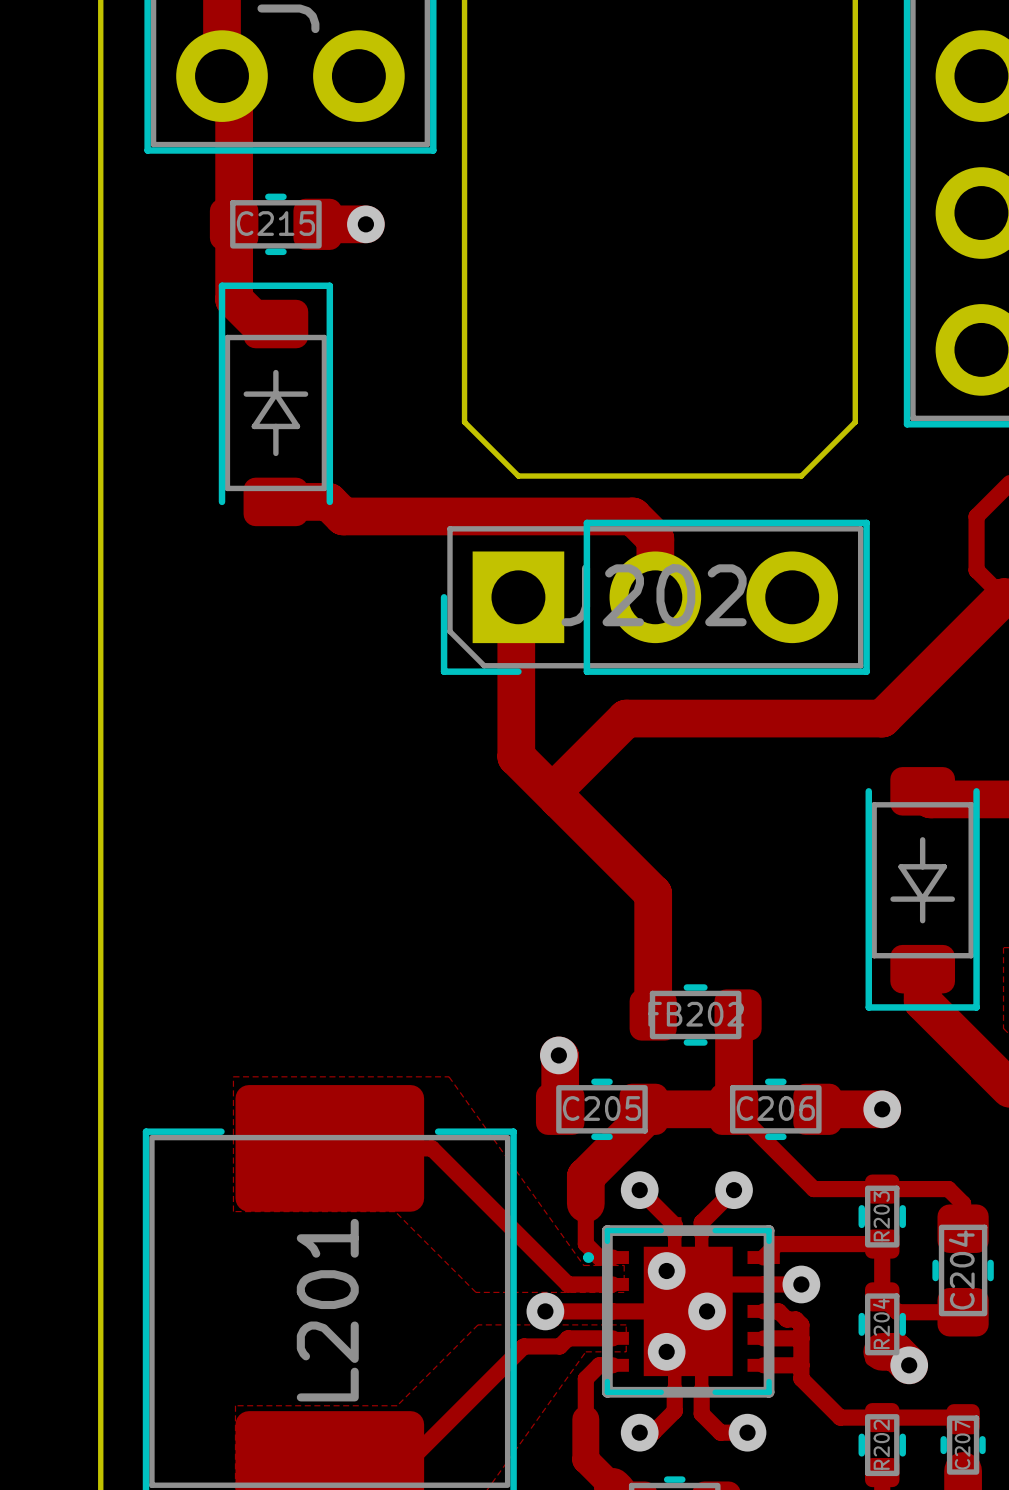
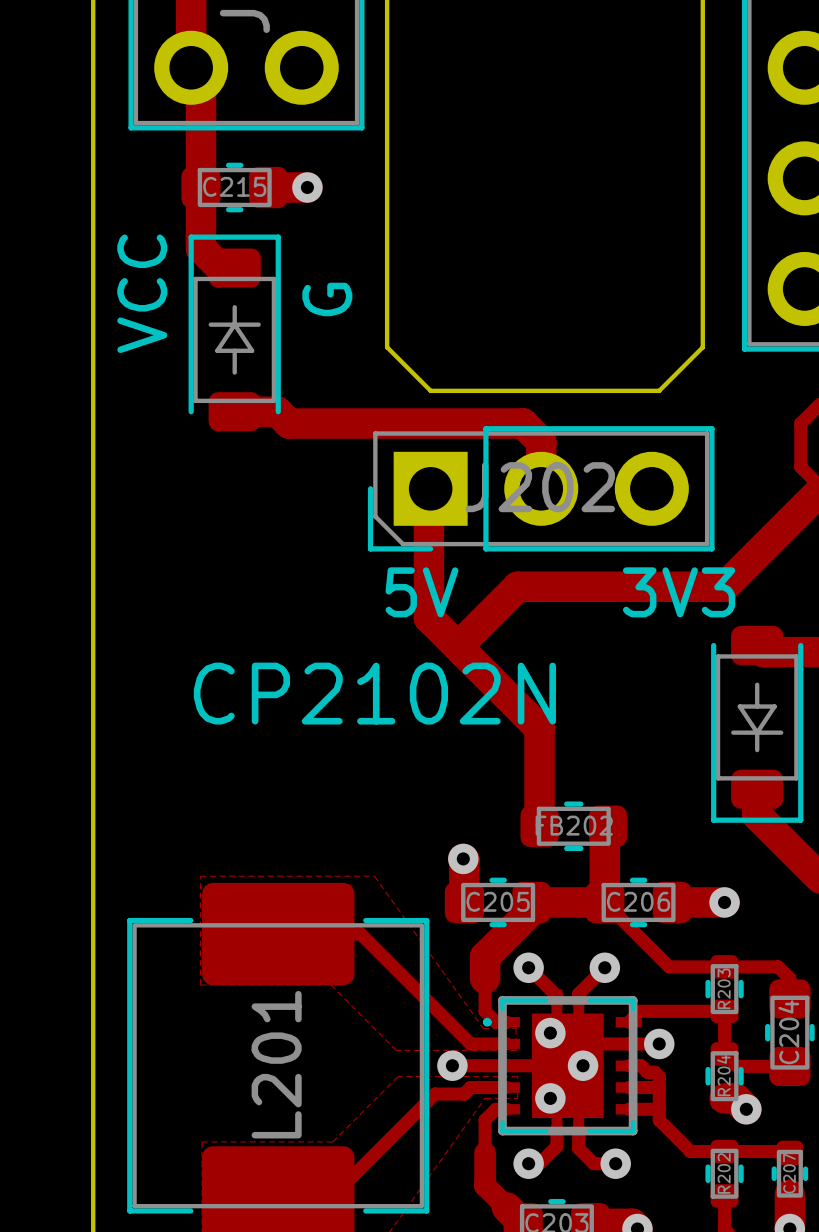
text: none -> VCC (142, 293)
text: none -> G (327, 299)
text: none -> 5V (421, 592)
text: none -> 3V3 (679, 592)
text: none -> CP2102N (374, 693)

